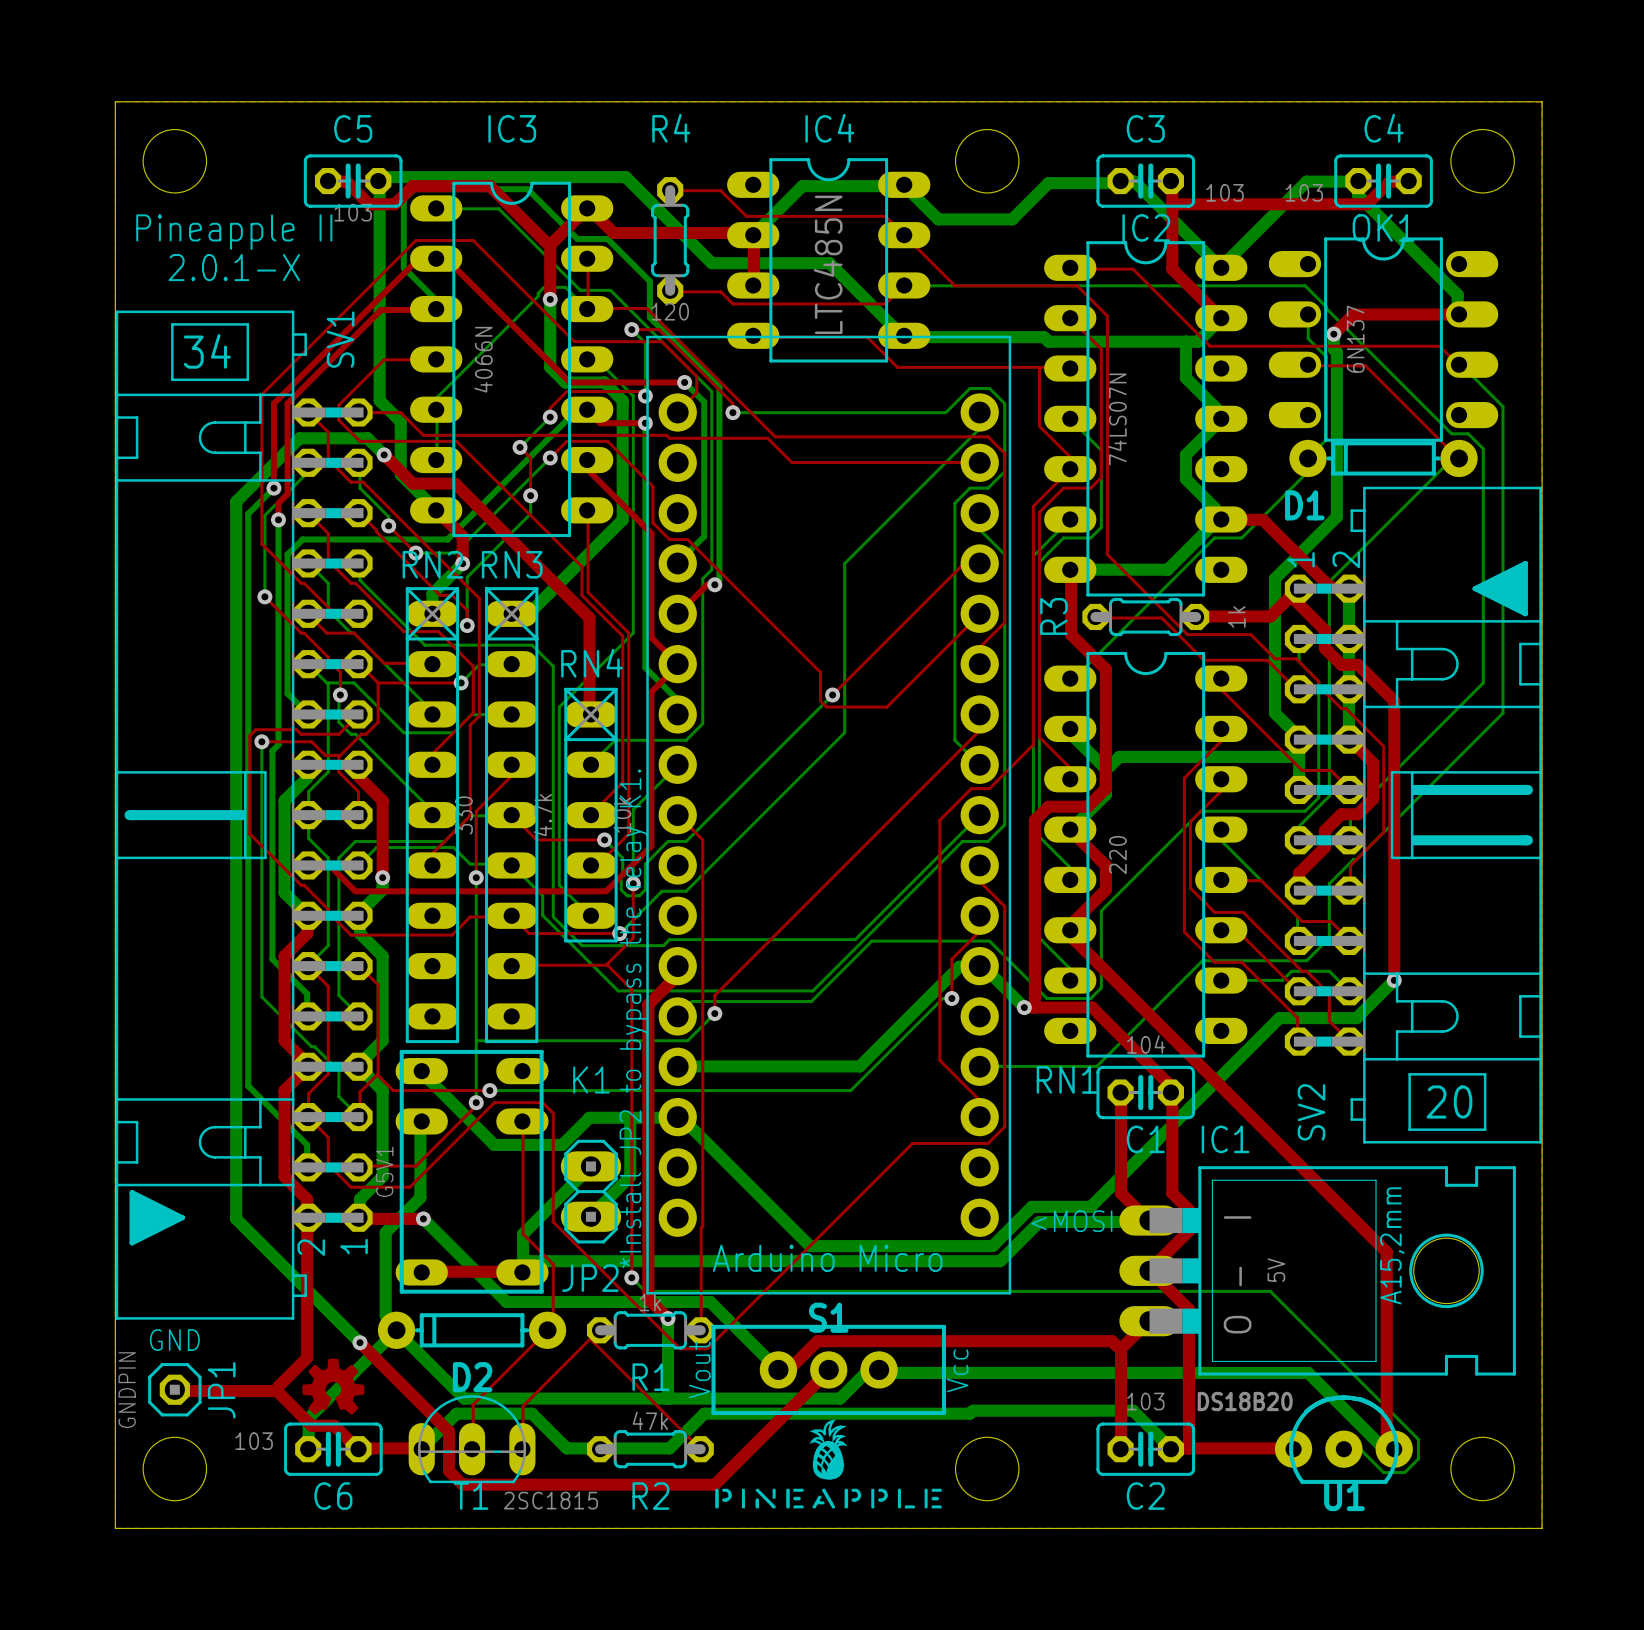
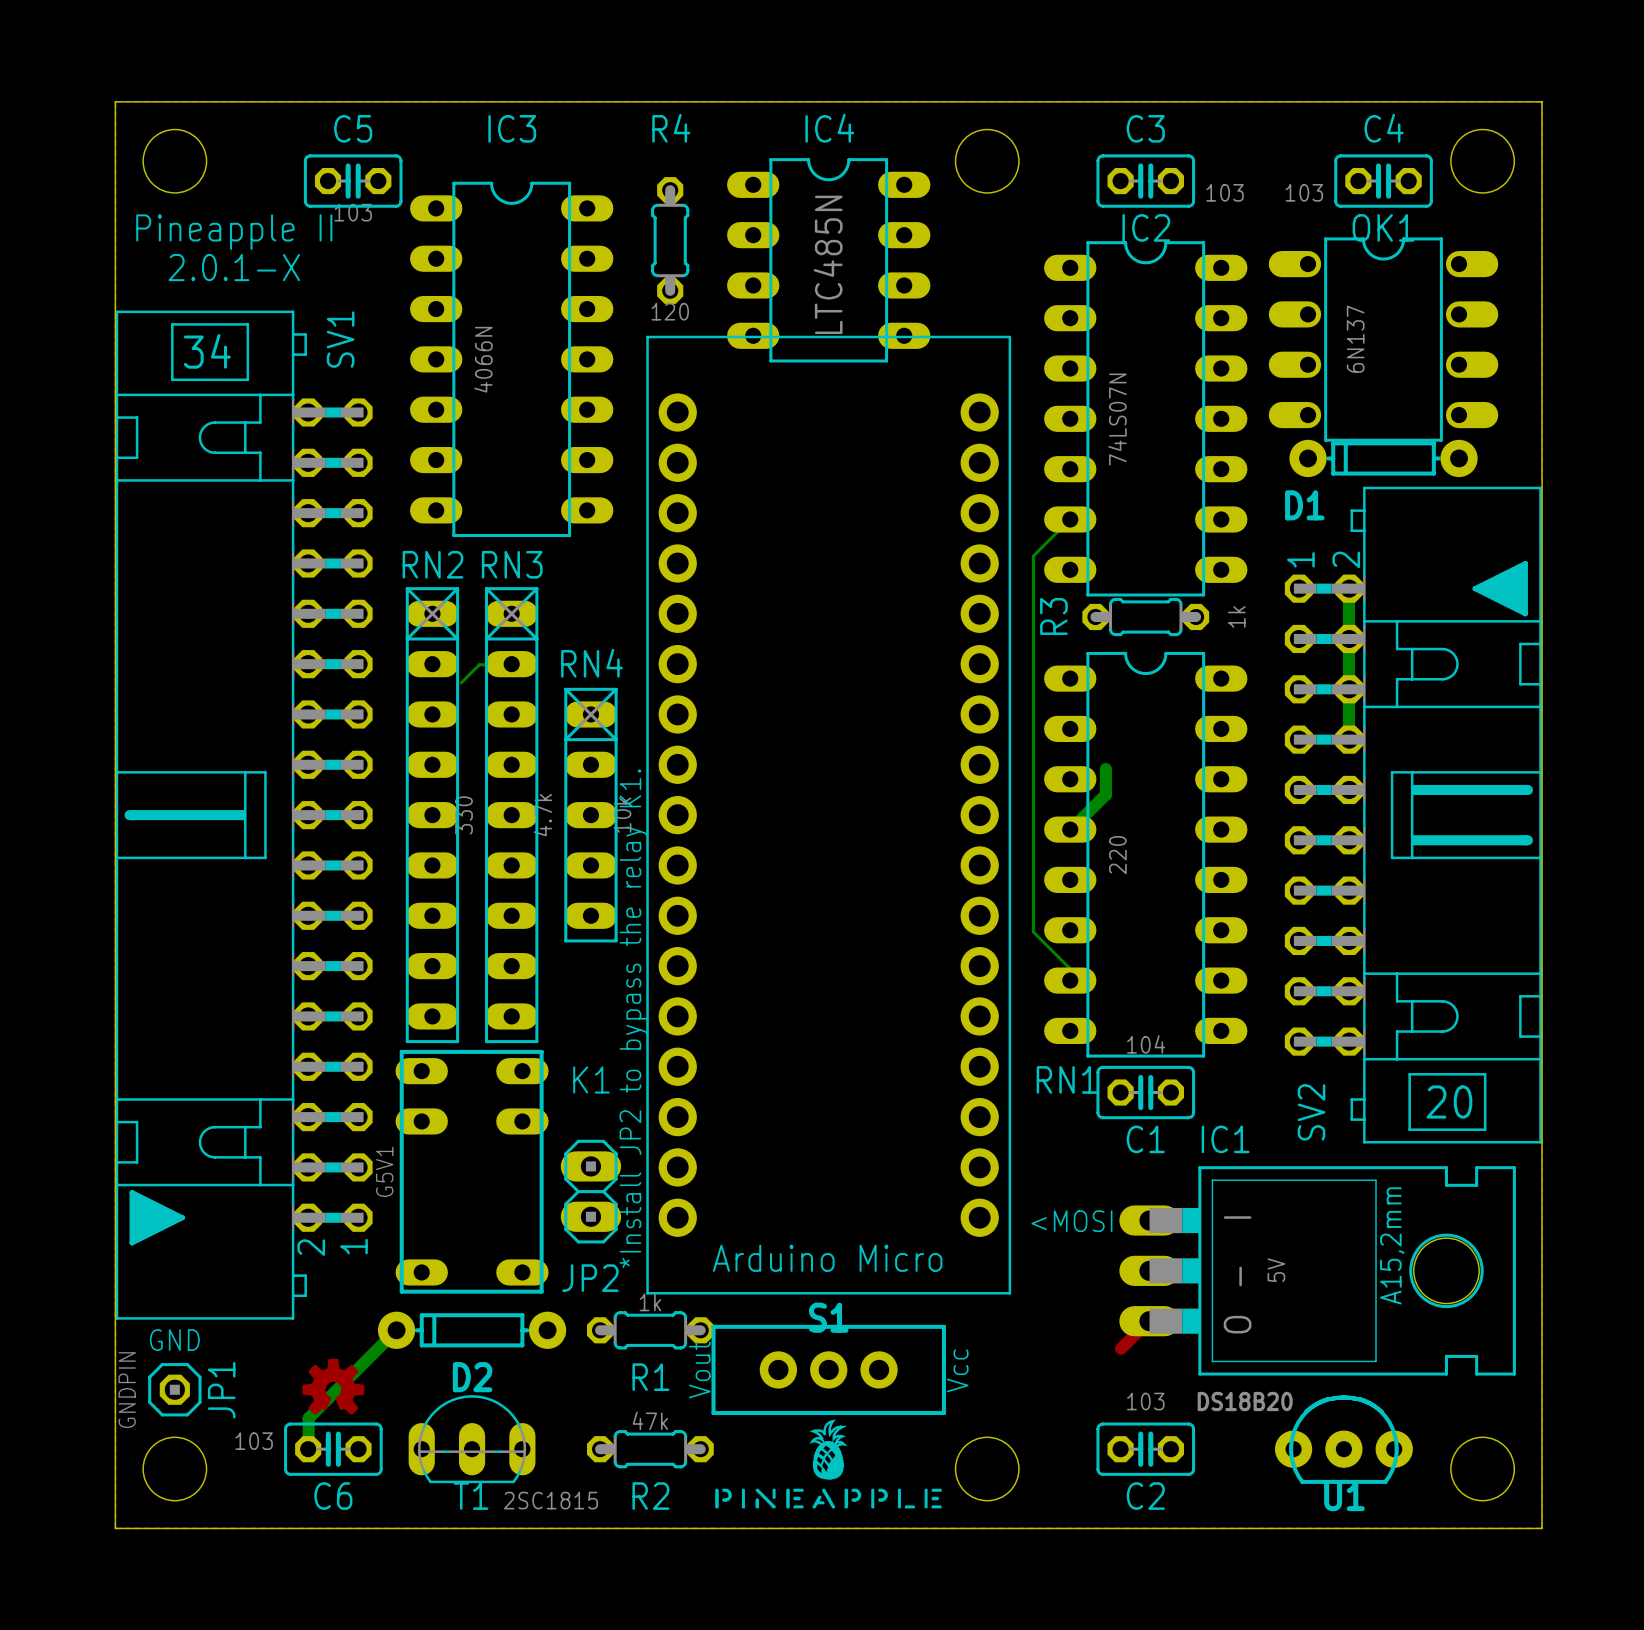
top track: (328, 181) (346, 181) (369, 204) (394, 204) (412, 186) (489, 186) (550, 245) -> none
top track: (1170, 181) (1172, 269) (1221, 318) -> none
top track: (1408, 181) (1389, 181) (1367, 204) (1172, 204) -> none
top track: (670, 190) (720, 190) (746, 216) (885, 216) (954, 285) (1077, 285) (1107, 316) (1107, 554) (1187, 634) (1250, 634) (1274, 658) (1296, 658) (1318, 681) (1318, 685) (1341, 708) (1345, 708) (1383, 746) (1383, 832) (1350, 865) (1349, 890) -> none
bottom track: (436, 208) (498, 208) (580, 290) (610, 290) (711, 391) (711, 569) (702, 578) (702, 723) (686, 740) (615, 740) (591, 764) -> none
bottom track: (753, 235) (802, 186) (904, 184) (938, 219) (1012, 219) (1048, 183) (1134, 181) (1221, 267) (1306, 181) (1358, 181) (1358, 195) (1457, 294) (1459, 314) -> none
top track: (550, 245) (550, 299) -> none
top track: (550, 245) (587, 208) (613, 232) (748, 232) (754, 236) (753, 285) -> none
top track: (587, 258) (587, 309) (646, 308) (775, 436) (988, 436) (1004, 453) (1004, 622) (980, 646) (979, 664) -> none
top track: (1070, 267) (1133, 269) (1210, 346) (1439, 346) (1459, 364) -> none
bottom track: (904, 285) (1305, 285) (1451, 433) (1468, 433) (1483, 448) (1483, 682) (1350, 815) (1349, 840) -> none
top track: (904, 285) (885, 303) (732, 303) (720, 291) (670, 290) -> none
bottom track: (550, 299) (550, 367) (565, 382) (604, 382) (622, 400) (622, 519) (529, 613) (511, 613) -> none
via: (550, 299) -> none
bottom track: (436, 309) (435, 299) (403, 267) (403, 199) (414, 189) (527, 189) (577, 239) (607, 239) (649, 281) (649, 317) (719, 386) (719, 580) (714, 584) -> none
top track: (436, 309) (381, 309) (287, 403) (287, 494) (278, 503) (278, 519) -> none
bottom track: (587, 309) (565, 287) (544, 287) (538, 293) (538, 296) (437, 397) (436, 460) -> none
bottom track: (1308, 314) (1308, 338) (1326, 356) (1326, 439) (1306, 459) (1306, 473) (1241, 537) (1214, 537) (1074, 678) (1070, 678) -> none
top track: (1459, 314) (1353, 314) (1333, 334) -> none
top track: (1070, 318) (1101, 349) (1101, 477) (1090, 488) (1063, 488) (1039, 512) (1039, 737) (1069, 767) (1070, 779) -> none
bottom track: (1221, 318) (1197, 341) (1048, 341) (1043, 337) (905, 337) (829, 263) (711, 263) (625, 177) (384, 177) (378, 181) (379, 400) (400, 421) (400, 474) (436, 510) -> none
bottom track: (631, 329) (645, 343) (645, 396) -> none
top track: (631, 329) (658, 329) (732, 403) (732, 412) -> none
via: (631, 329) -> none
bottom track: (1333, 334) (1333, 349) (1336, 352) (1336, 516) (1274, 578) (1274, 713) (1296, 734) (1299, 740) (1298, 789) -> none
via: (1333, 334) -> none
top track: (753, 335) (867, 337) (897, 367) (1070, 368) -> none
bottom track: (1185, 341) (1185, 377) (1220, 412) (1221, 418) (1185, 454) (1185, 479) (1214, 507) (1214, 515) (1221, 519) (1217, 519) (1167, 569) (1070, 569) -> none
top track: (436, 359) (384, 359) (338, 405) (338, 420) (360, 441) (456, 441) (581, 566) (581, 595) (622, 636) (622, 782) (590, 815) -> none
bottom track: (587, 359) (597, 359) (633, 396) (633, 633) (559, 707) (559, 885) (590, 915) -> none
top track: (1308, 364) (1365, 365) (1459, 458) -> none
bottom track: (1459, 364) (1502, 406) (1502, 713) (1356, 859) (1353, 859) (1329, 883) (1329, 938) (1306, 960) (1202, 960) (1096, 1066) (979, 1066) -> none
top track: (1039, 367) (1039, 426) (1069, 456) (1070, 469) (1033, 506) (1033, 744) (989, 788) (971, 788) (939, 820) (939, 1060) (979, 1099) (979, 1117) -> none
bottom track: (684, 382) (704, 402) (704, 536) (677, 563) -> none
top track: (684, 382) (569, 382) (447, 260) (417, 260) (273, 403) (273, 488) -> none
via: (684, 382) -> none
top track: (645, 396) (640, 391) (566, 391) (550, 408) (550, 417) -> none
via: (645, 396) -> none
bottom track: (587, 409) (575, 411) (447, 539) (302, 539) (287, 554) (287, 693) (308, 714) -> none
top track: (587, 409) (600, 423) (645, 423) -> none
top track: (308, 412) (328, 432) (328, 459) (350, 482) (363, 482) (479, 598) (479, 716) (470, 725) (470, 815) (432, 853) (432, 865) -> none
top track: (358, 412) (400, 412) (423, 435) (666, 435) (669, 438) (767, 438) (791, 462) (979, 462) -> none
top track: (677, 412) (696, 393) (696, 376) (661, 341) (574, 341) (473, 240) (415, 240) (261, 394) (261, 544) (334, 613) (358, 613) -> none
bottom track: (732, 412) (945, 412) (969, 388) (989, 388) (1004, 403) (1004, 471) (988, 488) (969, 488) (954, 503) (954, 740) (979, 764) -> none
via: (732, 412) -> none
bottom track: (979, 412) (979, 429) (844, 563) (844, 732) (686, 891) (661, 891) (619, 933) -> none
bottom track: (550, 417) (520, 447) -> none
via: (550, 417) -> none
bottom track: (1070, 418) (1101, 450) (1101, 527) (1090, 537) (1063, 537) (1039, 562) (1039, 836) (1069, 867) (1070, 879) -> none
bottom track: (645, 423) (645, 667) (677, 699) (677, 714) -> none
via: (645, 423) -> none
top track: (520, 447) (530, 457) (530, 495) -> none
via: (520, 447) -> none
bottom track: (384, 454) (367, 438) (299, 438) (236, 501) (236, 1218) (360, 1342) -> none
top track: (384, 454) (412, 483) (455, 483) (589, 618) (590, 714) -> none
via: (384, 454) -> none
bottom track: (550, 457) (455, 553) (415, 553) -> none
top track: (550, 457) (566, 441) (607, 441) (652, 486) (652, 522) (669, 539) (687, 539) (820, 672) (820, 701) (826, 707) (886, 707) (979, 613) -> none
via: (550, 457) -> none
bottom track: (1459, 458) (1451, 459) (1329, 581) (1329, 796) (1299, 826) (1298, 840) -> none
top track: (587, 460) (587, 470) (651, 533) (651, 637) (677, 664) (651, 691) (651, 845) (606, 891) (355, 891) (329, 865) (308, 865) -> none
bottom track: (308, 462) (307, 473) (264, 515) (264, 596) -> none
bottom track: (358, 462) (360, 488) (388, 516) (388, 525) -> none
bottom track: (273, 488) (248, 513) (248, 1086) (307, 1144) (308, 1167) -> none
via: (273, 488) -> none
bottom track: (530, 495) (530, 513) (467, 577) (467, 625) -> none
via: (530, 495) -> none
top track: (436, 510) (462, 536) (462, 563) -> none
top track: (587, 510) (587, 592) (628, 633) (628, 833) (598, 864) (590, 865) -> none
top track: (308, 513) (328, 533) (328, 560) (350, 583) (355, 583) (403, 631) (438, 631) (473, 666) (473, 713) (432, 753) (432, 764) -> none
top track: (358, 513) (440, 595) (452, 595) (467, 610) (467, 625) -> none
bottom track: (979, 513) (980, 530) (1004, 554) (1004, 824) (988, 841) (962, 841) (812, 990) (618, 990) (542, 915) (542, 895) (510, 864) (470, 864) (453, 847) (376, 847) (358, 865) -> none
bottom track: (278, 519) (278, 744) (272, 750) (272, 959) (307, 993) (308, 1016) -> none
via: (278, 519) -> none
top track: (1221, 519) (1262, 519) (1330, 587) (1349, 588) -> none
top track: (388, 525) (415, 553) -> none
via: (388, 525) -> none
via: (415, 553) -> none
bottom track: (308, 563) (328, 583) (328, 610) (350, 633) (353, 633) (430, 710) (432, 714) -> none
bottom track: (358, 563) (360, 580) (424, 645) (532, 645) (553, 666) (553, 916) (581, 945) (663, 945) (669, 939) (855, 939) (979, 815) -> none
bottom track: (462, 563) (432, 593) (432, 613) -> none
via: (462, 563) -> none
top track: (979, 563) (963, 563) (832, 695) -> none
top track: (1070, 569) (1071, 634) (1105, 669) (1105, 788) (1087, 806) (1048, 806) (1034, 820) (1034, 1007) -> none
top track: (714, 584) (707, 584) (677, 613) -> none
via: (714, 584) -> none
top track: (264, 596) (301, 633) (304, 633) (340, 672) (340, 695) -> none
via: (264, 596) -> none
top track: (308, 613) (326, 633) (353, 633) (384, 663) (432, 664) -> none
top track: (1095, 616) (1161, 618) (1204, 660) (1267, 660) (1297, 690) (1298, 689) -> none
top track: (1196, 616) (1270, 616) (1298, 588) (1294, 599) (1324, 630) (1324, 648) (1341, 664) (1358, 664) (1394, 701) (1394, 980) -> none
via: (467, 625) -> none
bottom track: (1299, 639) (1299, 661) (1318, 681) (1318, 797) (1305, 811) (1201, 811) (1101, 910) (1101, 987) (1090, 998) (1046, 998) (989, 941) (871, 941) (811, 1001) (692, 1001) (677, 1016) -> none
bottom track: (308, 664) (326, 682) (353, 682) (403, 732) (453, 732) (471, 714) (511, 714) -> none
top track: (358, 664) (378, 682) -> none
top track: (1221, 678) (1222, 690) (1302, 770) (1330, 770) (1349, 789) -> none
bottom track: (328, 682) (328, 772) (308, 791) (308, 815) (308, 838) (328, 858) (328, 945) (308, 966) -> none
top track: (378, 682) (461, 682) -> none
top track: (378, 682) (378, 722) (366, 734) (361, 734) (338, 756) (338, 772) (358, 791) (358, 815) -> none
via: (461, 682) -> none
bottom track: (340, 695) (338, 722) (350, 734) (355, 734) (430, 809) (432, 815) -> none
via: (340, 695) -> none
bottom track: (832, 695) (686, 841) (668, 841) (645, 864) (645, 889) (639, 895) (627, 895) (621, 889) (622, 858) (604, 839) -> none
via: (832, 695) -> none
top track: (358, 714) (338, 734) (301, 734) (296, 729) (255, 729) (249, 735) (249, 833) (328, 909) (328, 912) (350, 935) (452, 935) (470, 916) (511, 915) (529, 933) (619, 933) -> none
top track: (979, 714) (979, 731) (714, 995) (714, 1013) -> none
bottom track: (1070, 728) (1071, 734) (1105, 768) (1119, 756) (1299, 756) -> none
top track: (1221, 728) (1220, 741) (1184, 778) (1184, 932) (1214, 962) (1241, 962) (1297, 1018) (1298, 1041) -> none
top track: (1349, 739) (1373, 762) (1373, 799) (1358, 814) (1341, 814) (1324, 830) (1324, 847) (1299, 873) (1298, 890) -> none
bottom track: (261, 741) (261, 996) (338, 1070) (338, 1096) (358, 1117) -> none
top track: (261, 741) (311, 741) (325, 755) (339, 756) -> none
via: (261, 741) -> none
bottom track: (308, 764) (307, 778) (284, 800) (284, 892) (308, 915) -> none
top track: (358, 764) (360, 778) (382, 800) (382, 877) -> none
top track: (511, 764) (510, 776) (476, 811) (476, 877) -> none
bottom track: (677, 764) (633, 809) (633, 883) -> none
top track: (1221, 779) (1220, 791) (1190, 821) (1190, 888) (1214, 912) (1243, 912) (1302, 971) (1306, 971) (1329, 993) (1329, 1021) (1349, 1041) -> none
bottom track: (511, 815) (470, 815) (444, 841) (355, 841) (338, 858) (338, 995) (358, 1016) -> none
top track: (511, 815) (536, 839) (604, 839) -> none
top track: (677, 815) (702, 839) (702, 1226) (700, 1330) -> none
top track: (1070, 829) (1105, 865) (1105, 889) (1071, 924) (1070, 930) (1074, 935) (1074, 939) (1386, 1252) (1386, 1442) (1394, 1449) -> none
bottom track: (1221, 829) (1222, 841) (1297, 916) (1298, 940) -> none
via: (604, 839) -> none
top track: (979, 865) (980, 882) (1004, 906) (1004, 1126) (988, 1143) (912, 1143) (707, 1348) (680, 1348) (553, 1221) (553, 1113) (542, 1102) (494, 1102) (409, 1187) (350, 1187) (328, 1164) (328, 1137) (308, 1117) (308, 1093) (328, 1073) (328, 986) (308, 966) -> none
bottom track: (382, 877) (382, 889) (358, 915) (360, 933) (382, 956) (382, 1040) (358, 1066) (382, 1090) (382, 1176) (360, 1199) (358, 1217) -> none
via: (382, 877) -> none
bottom track: (476, 877) (476, 1102) -> none
via: (476, 877) -> none
top track: (1221, 879) (1261, 880) (1302, 921) (1330, 921) (1349, 940) -> none
top track: (633, 883) (633, 938) (606, 965) (511, 966) -> none
via: (633, 883) -> none
top track: (308, 915) (307, 933) (284, 956) (284, 1040) (308, 1066) (284, 1090) (284, 1176) (307, 1199) (307, 1357) (278, 1386) (276, 1391) -> none
top track: (979, 915) (979, 932) (951, 959) (951, 998) -> none
top track: (1221, 930) (1237, 930) (1298, 991) -> none
via: (619, 933) -> none
top track: (606, 964) (631, 989) (631, 1277) -> none
top track: (358, 966) (378, 984) (378, 1073) (360, 1092) (358, 1117) -> none
top track: (677, 966) (677, 975) (648, 1004) (648, 1298) (668, 1318) -> none
bottom track: (1221, 980) (1282, 980) (1291, 971) (1329, 971) (1349, 991) -> none
bottom track: (1394, 980) (1356, 1018) (1279, 1018) (1090, 1206) (1031, 1206) (992, 1246) (809, 1246) (683, 1119) (677, 1117) (589, 1117) (562, 1144) (494, 1144) (421, 1071) -> none
via: (1394, 980) -> none
bottom track: (951, 998) (942, 998) (850, 1090) (489, 1090) -> none
via: (951, 998) -> none
bottom track: (1024, 1007) (985, 968) (979, 966) (959, 966) (859, 1066) (677, 1066) -> none
top track: (1024, 1007) (1092, 1007) (1167, 1083) (1167, 1087) (1172, 1093) (1172, 1193) (1188, 1209) (1188, 1231) (1149, 1270) (1188, 1309) (1188, 1448) -> none
via: (1024, 1007) -> none
bottom track: (714, 1013) (687, 1040) (476, 1040) -> none
via: (714, 1013) -> none
top track: (377, 1074) (393, 1090) (489, 1090) -> none
via: (489, 1090) -> none
top track: (1120, 1092) (1120, 1193) (1149, 1220) -> none
top track: (476, 1102) (476, 1105) (415, 1166) (358, 1167) -> none
via: (476, 1102) -> none
bottom track: (630, 1117) (630, 1176) (590, 1216) -> none
bottom track: (421, 1121) (420, 1197) (385, 1232) (385, 1315) (394, 1324) (400, 1335) (464, 1398) (840, 1398) (867, 1371) (879, 1369) (883, 1372) (1308, 1372) (1383, 1448) (1394, 1449) -> none
top track: (522, 1121) (523, 1234) (553, 1264) (553, 1324) (473, 1404) (472, 1449) -> none
bottom track: (590, 1166) (523, 1234) (522, 1272) (527, 1261) (1000, 1261) (1039, 1221) (1149, 1220) -> none
top track: (358, 1217) (423, 1218) -> none
bottom track: (423, 1218) (506, 1301) (710, 1301) (778, 1369) -> none
via: (423, 1218) -> none
top track: (421, 1272) (522, 1272) -> none
bottom track: (631, 1277) (645, 1291) (1270, 1291) (1418, 1439) (1418, 1458) (1404, 1472) (1383, 1472) (1361, 1449) (1343, 1449) -> none
via: (631, 1277) -> none
bottom track: (668, 1318) (668, 1398) -> none
via: (668, 1318) -> none
top track: (360, 1342) (449, 1431) (449, 1471) (462, 1484) (714, 1484) (828, 1369) -> none
via: (360, 1342) -> none
top track: (778, 1369) (788, 1369) (817, 1341) (1111, 1341) (1120, 1348) (1120, 1449) -> none
top track: (174, 1389) (276, 1391) -> none
top track: (276, 1391) (311, 1425) (334, 1425) (358, 1449) (421, 1449) -> none
bottom track: (421, 1449) (456, 1413) (532, 1413) (566, 1448) (600, 1449) (669, 1448) (704, 1413) (969, 1413) (973, 1410) (1133, 1410) (1170, 1449) -> none
top track: (522, 1449) (523, 1406) (600, 1330) (591, 1339) (700, 1449) -> none
top track: (1170, 1449) (1293, 1449) -> none

